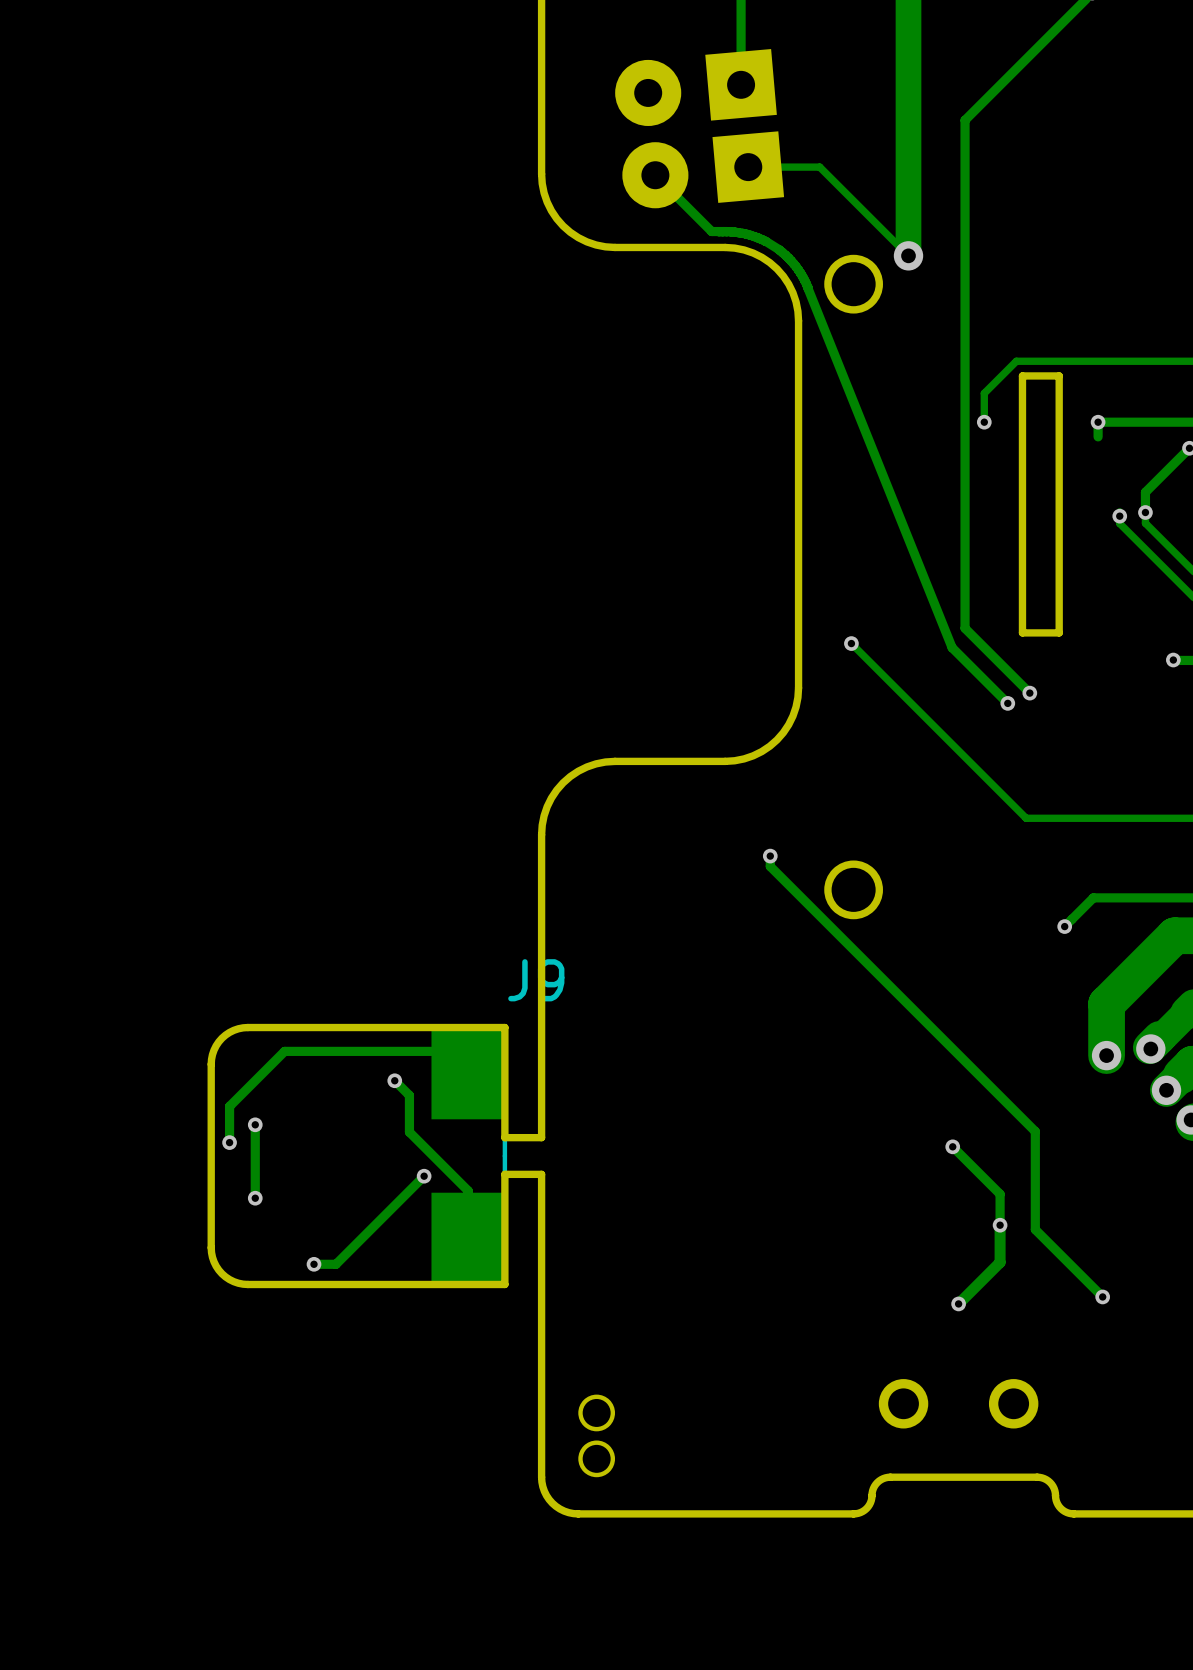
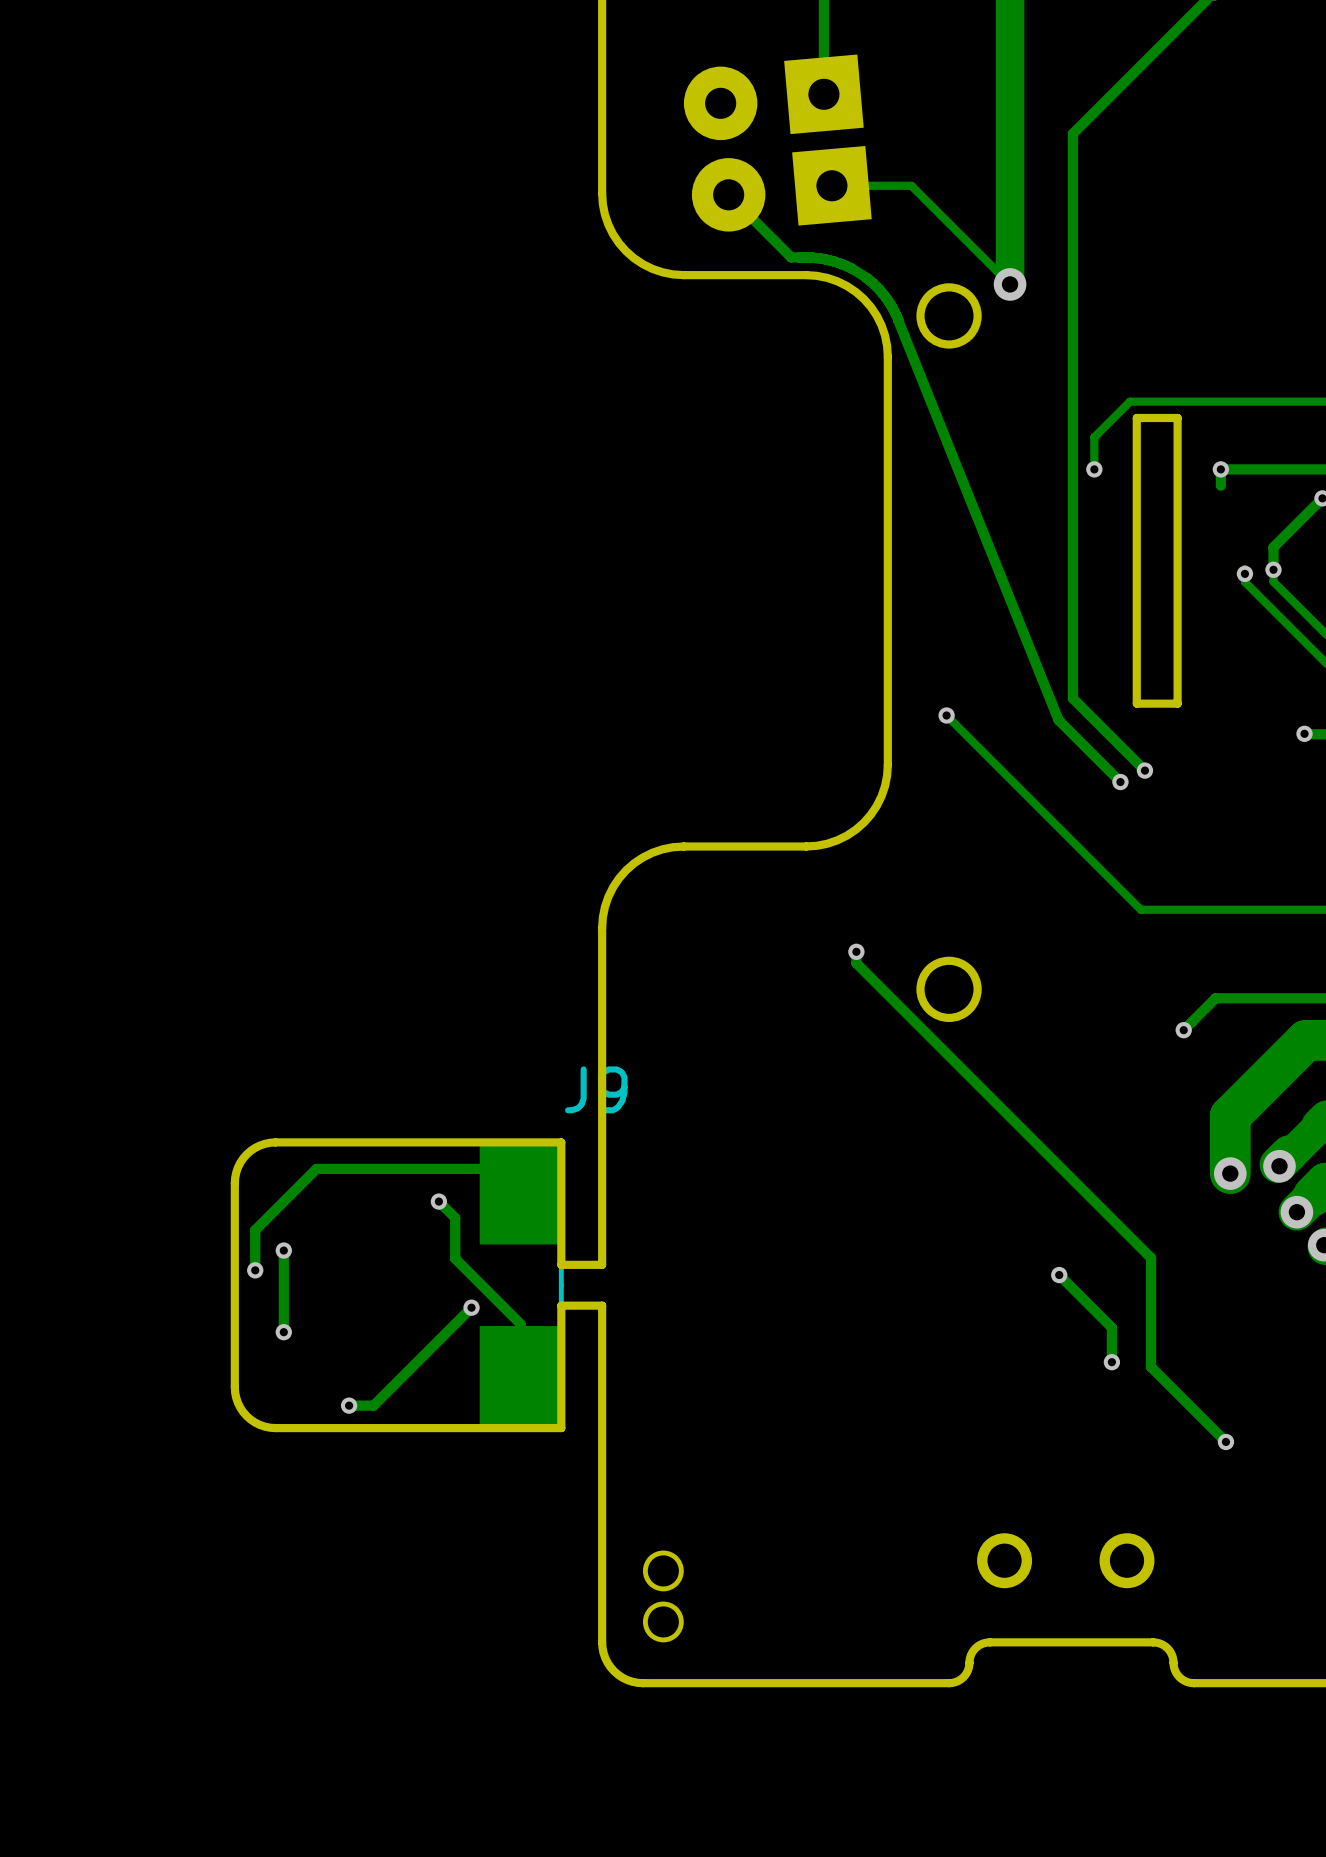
track: (1000, 1225) (1000, 1262) (958, 1303) -> none
via: (958, 1303) -> none

